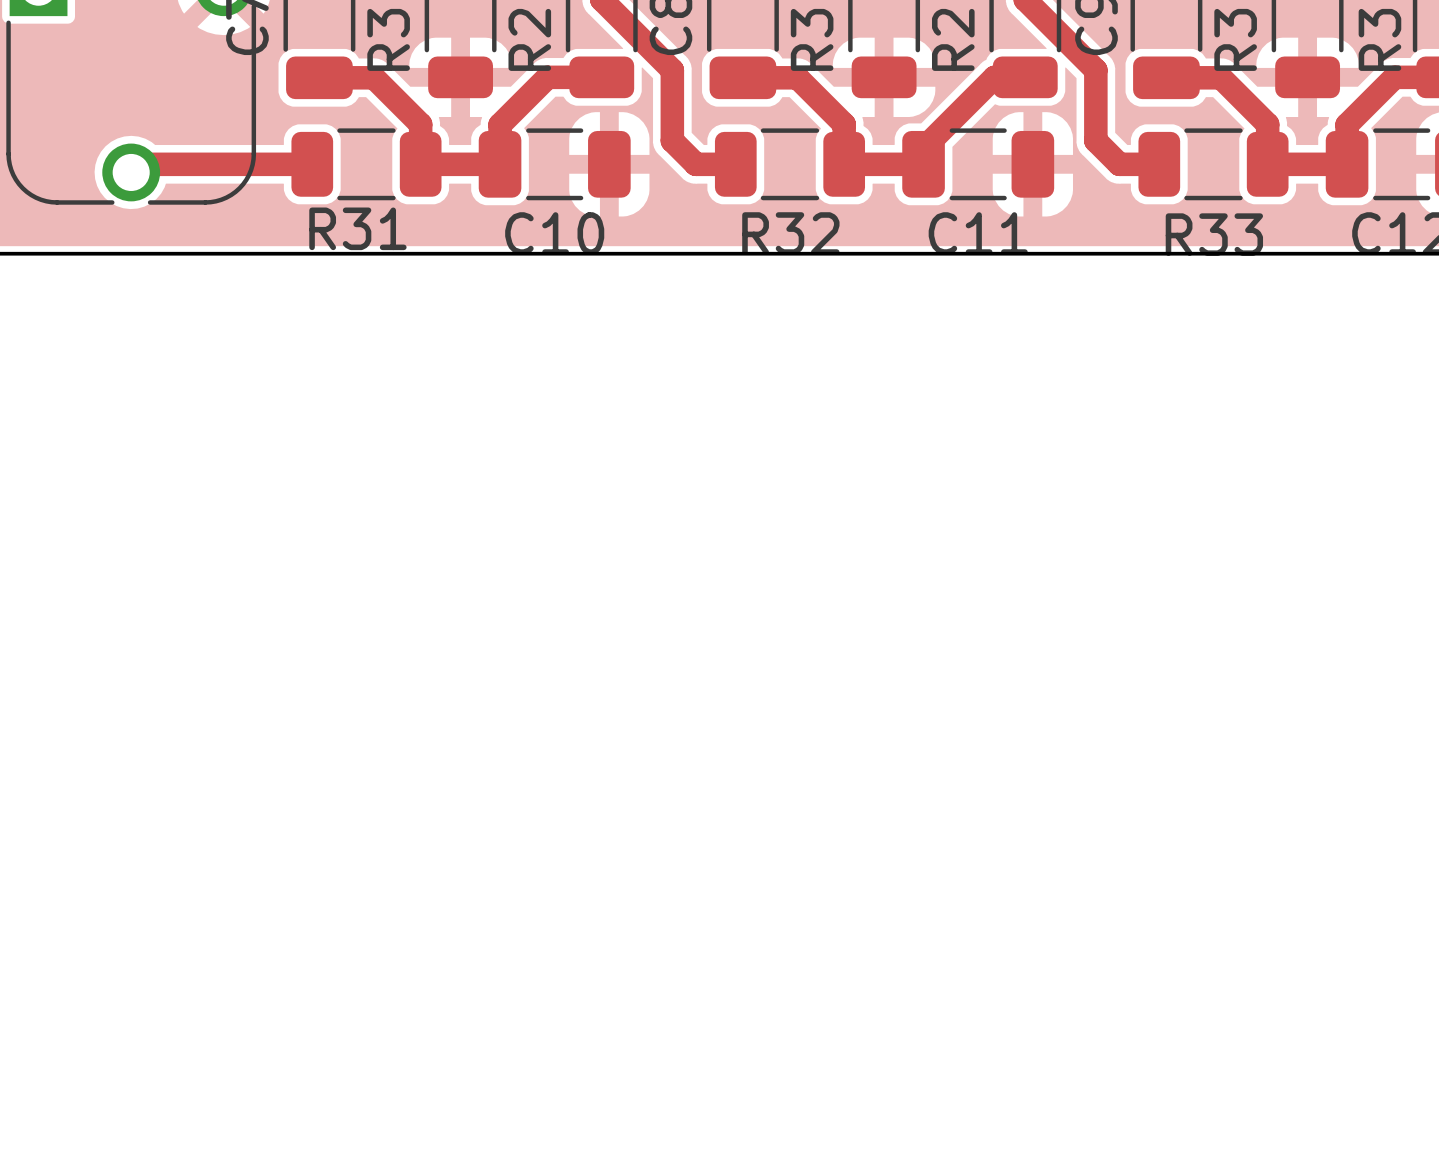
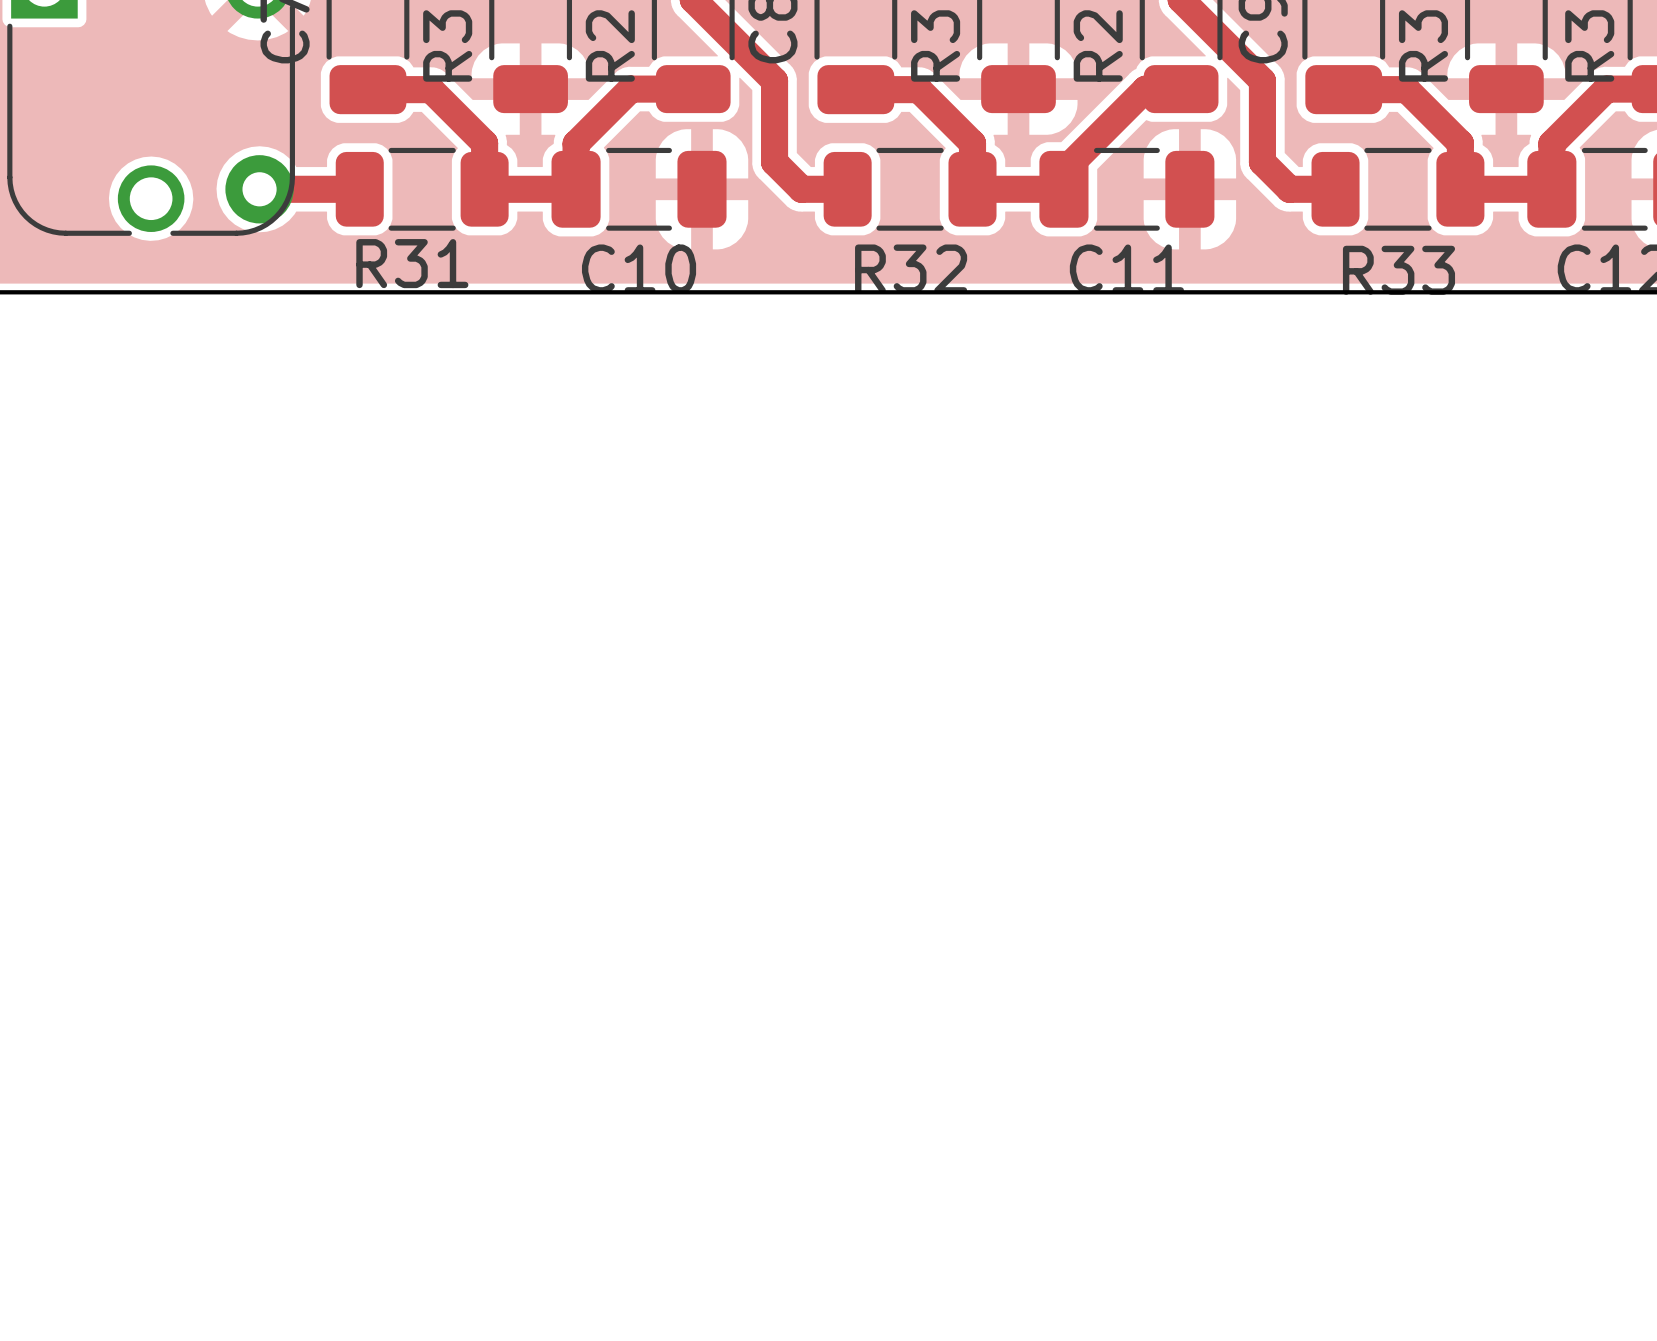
track: (225, 164) (139, 164) (131, 172) -> none
via: none -> (259, 189)

